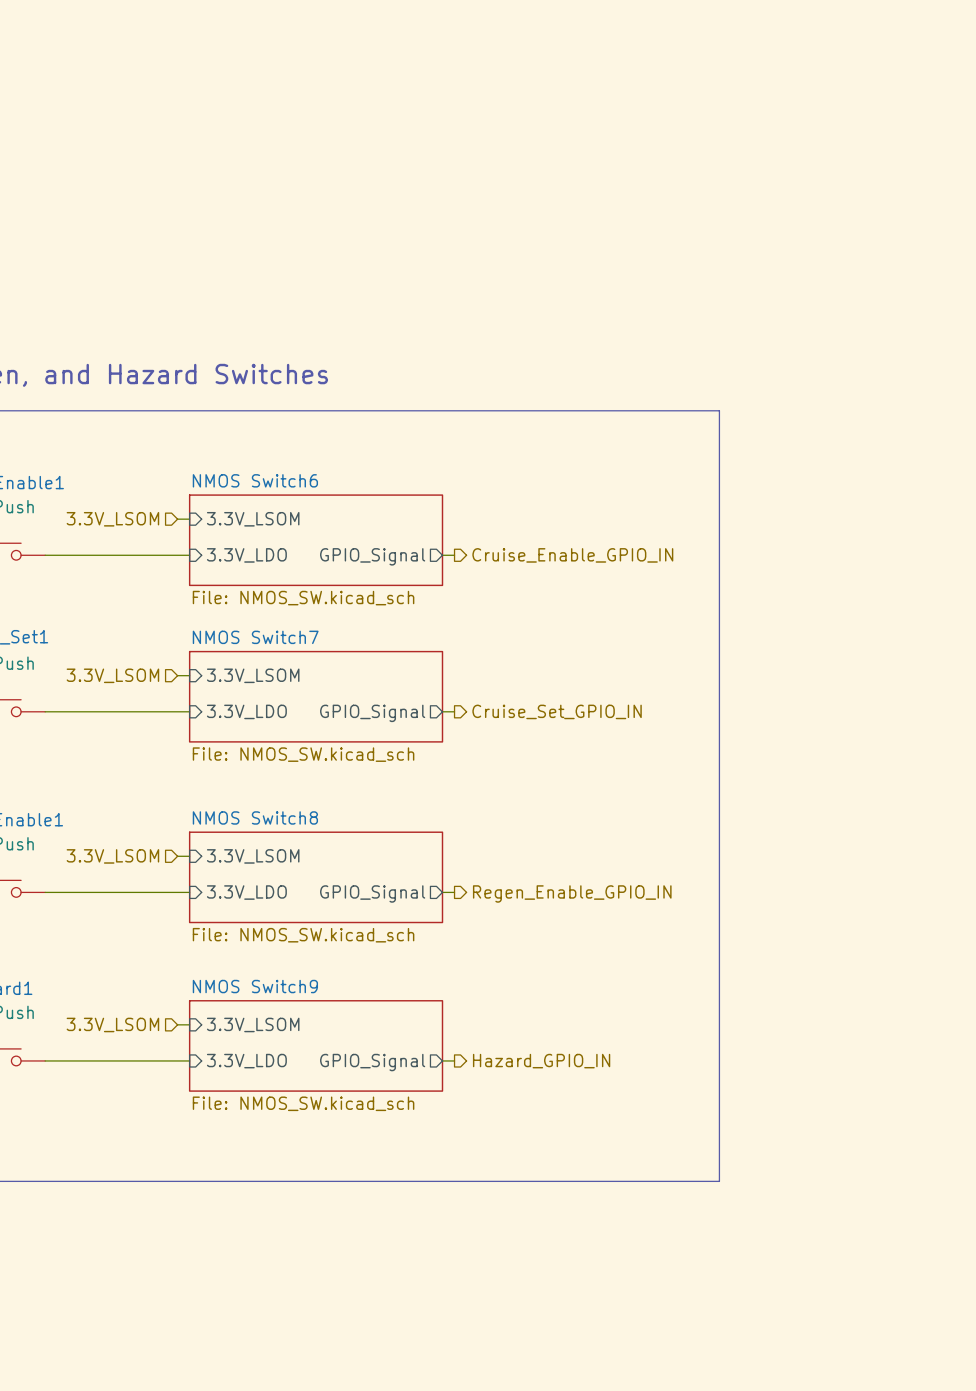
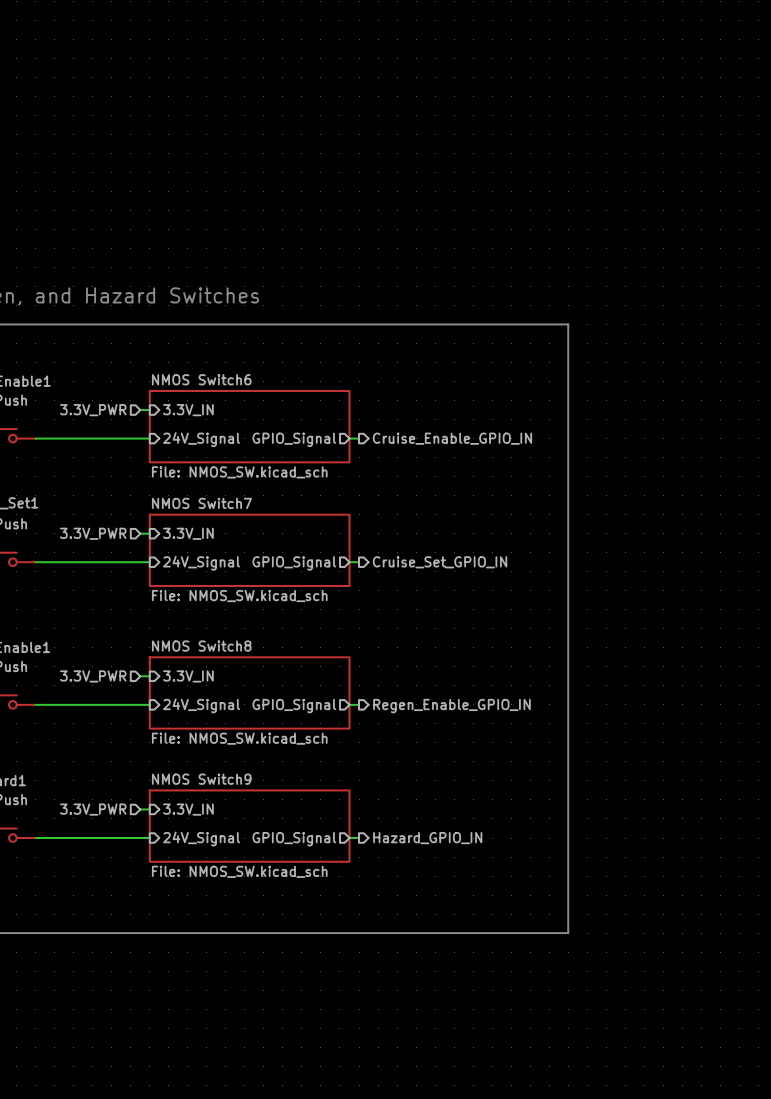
hierarchical label: 3.3V_LSOM (112, 519) -> 3.3V_PWR (93, 410)
sheet pin: 3.3V_LSOM (253, 519) -> 3.3V_IN (188, 410)
sheet pin: 3.3V_LDO (246, 555) -> 24V_Signal (201, 439)
hierarchical label: 3.3V_LSOM (112, 675) -> 3.3V_PWR (93, 533)
sheet pin: 3.3V_LSOM (253, 675) -> 3.3V_IN (188, 533)
sheet pin: 3.3V_LDO (246, 711) -> 24V_Signal (201, 563)
hierarchical label: 3.3V_LSOM (112, 856) -> 3.3V_PWR (93, 676)
sheet pin: 3.3V_LSOM (253, 856) -> 3.3V_IN (188, 676)
sheet pin: 3.3V_LDO (246, 892) -> 24V_Signal (201, 705)
hierarchical label: 3.3V_LSOM (112, 1024) -> 3.3V_PWR (93, 809)
sheet pin: 3.3V_LSOM (253, 1024) -> 3.3V_IN (188, 809)
sheet pin: 3.3V_LDO (246, 1061) -> 24V_Signal (201, 839)

